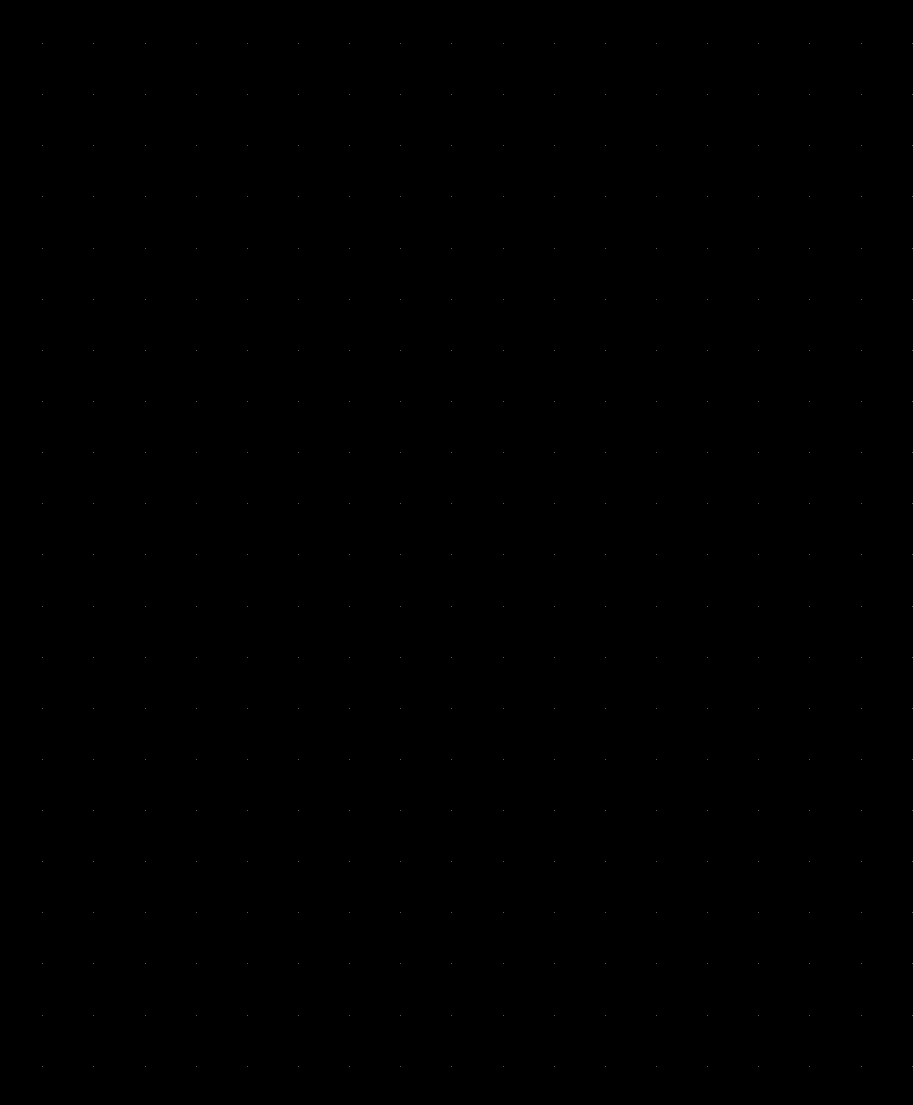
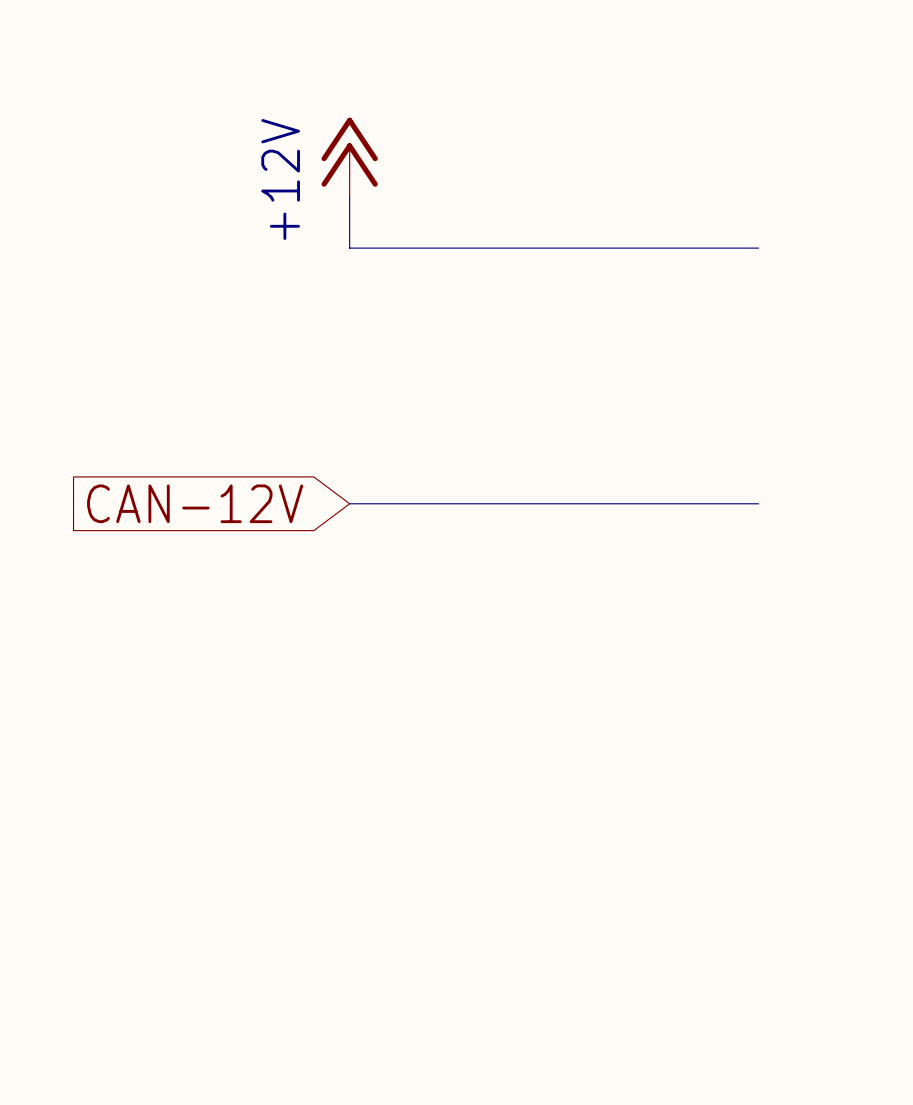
power symbol: none -> +12V (349, 157)
wire: none -> (349, 196) (349, 248) (758, 248)
global label: none -> CAN-12V (195, 503)
wire: none -> (349, 503) (758, 503)

